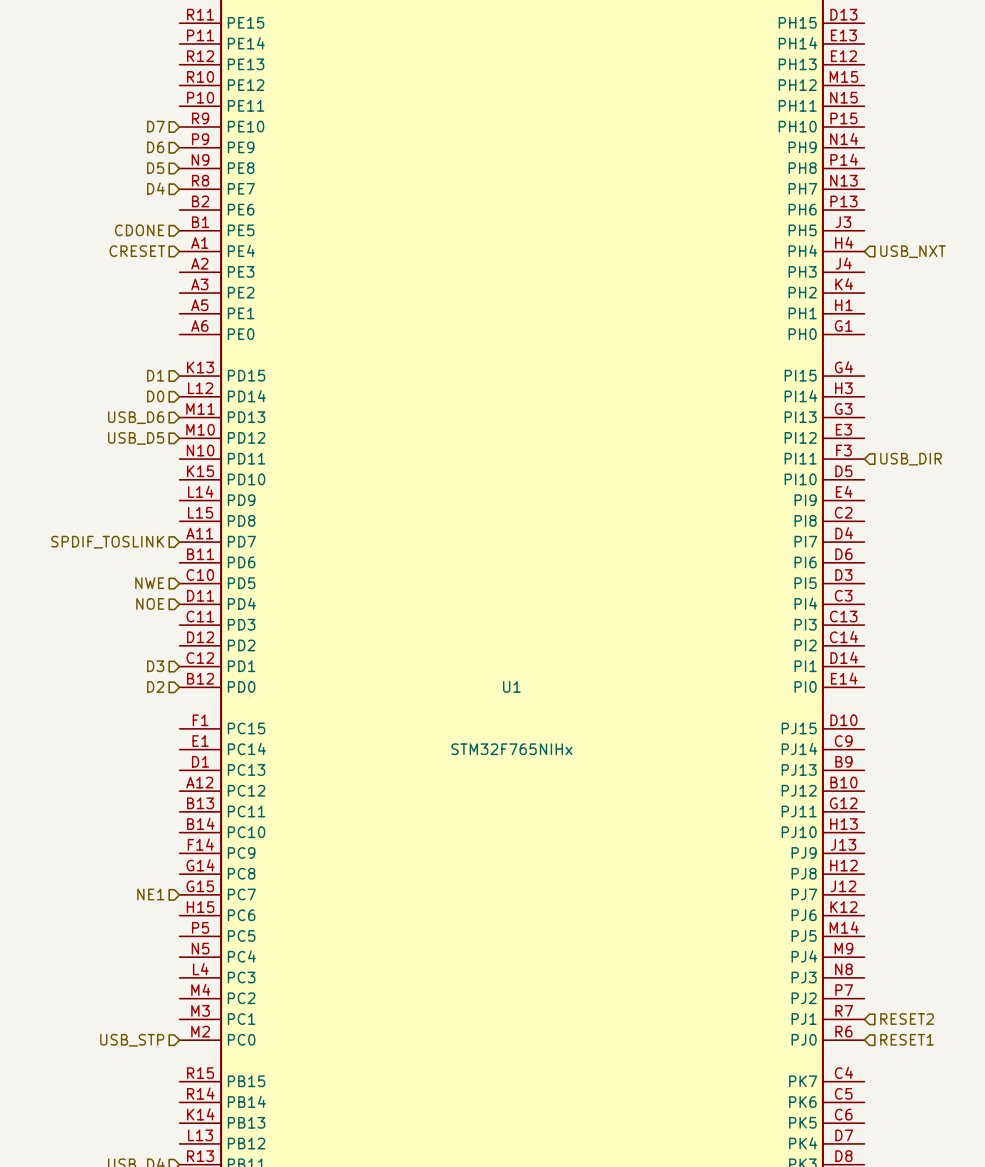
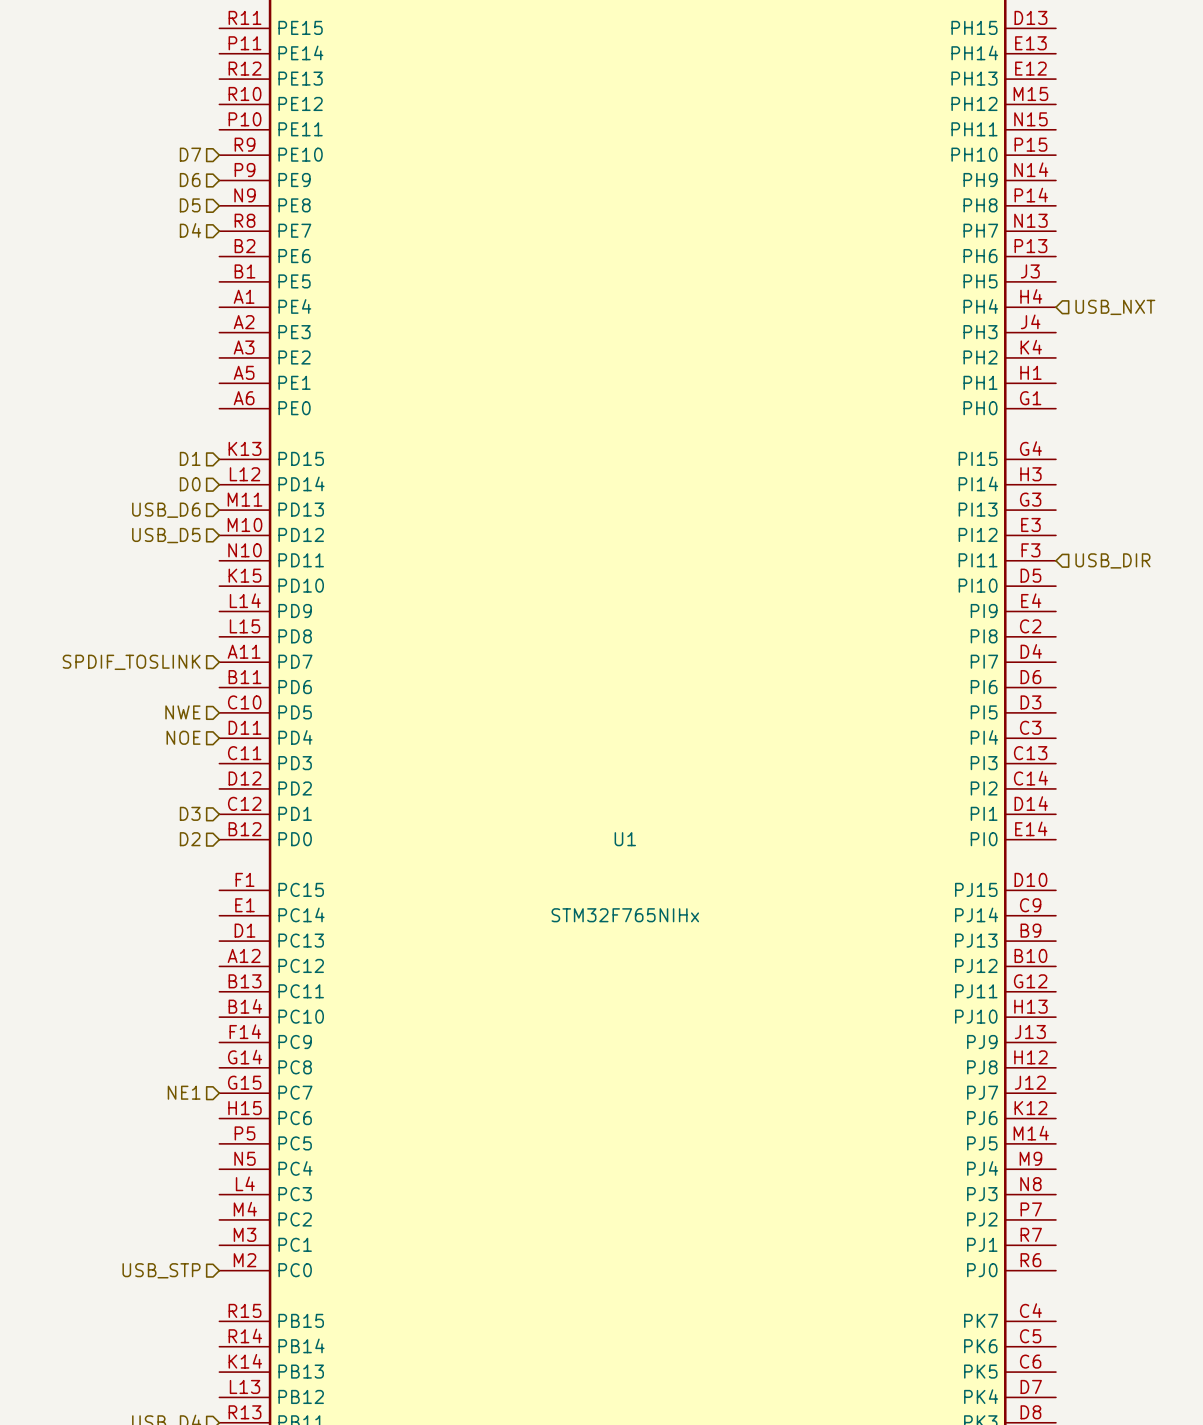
hierarchical label: CDONE (139, 230) -> none
hierarchical label: CRESET (137, 251) -> none
hierarchical label: RESET2 (907, 1019) -> none
hierarchical label: RESET1 (907, 1039) -> none

